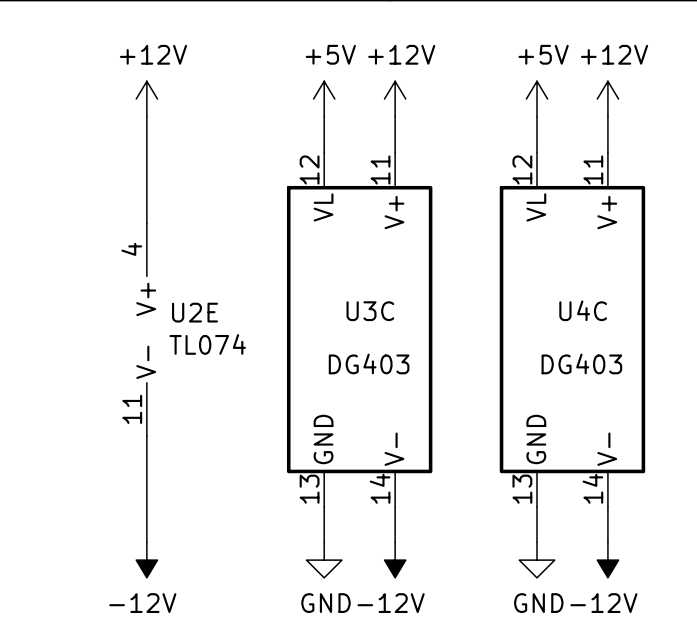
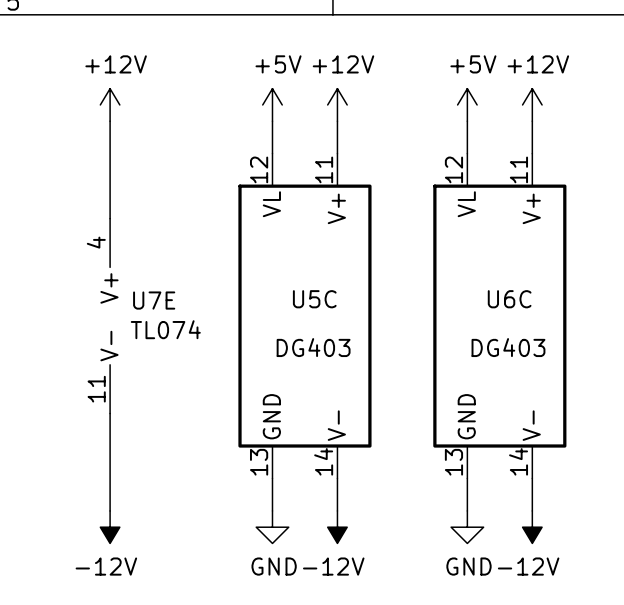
U4C name: U4C (583, 310) -> U6C (509, 299)
U3C name: U3C (370, 311) -> U5C (314, 299)
U2E name: U2E (195, 312) -> U7E (154, 300)

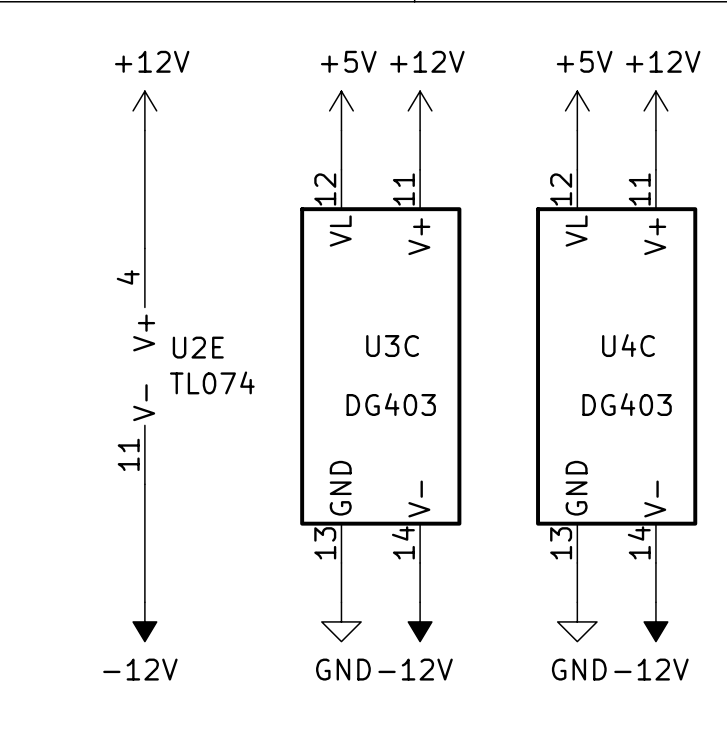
U5C name: U5C (314, 299) -> U3C (392, 346)
U6C name: U6C (509, 299) -> U4C (628, 345)
U7E name: U7E (154, 300) -> U2E (198, 347)

